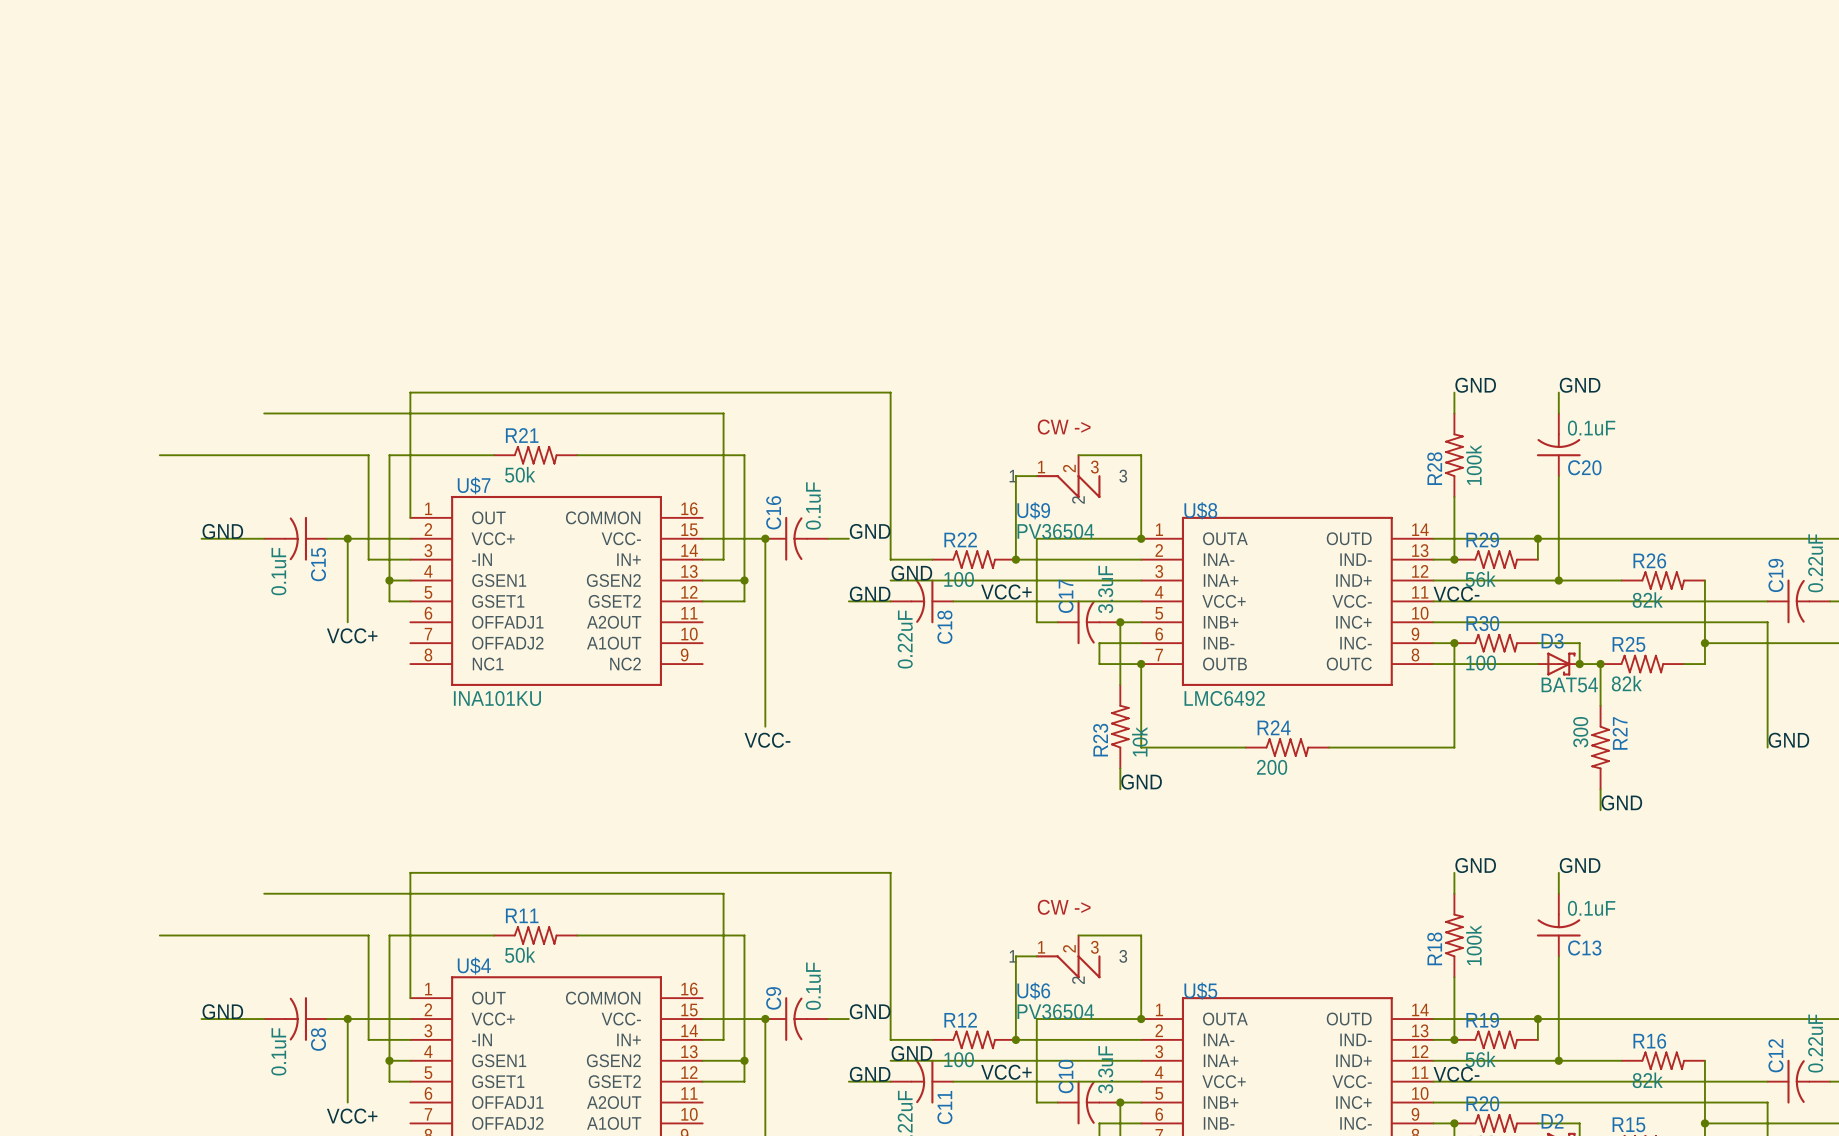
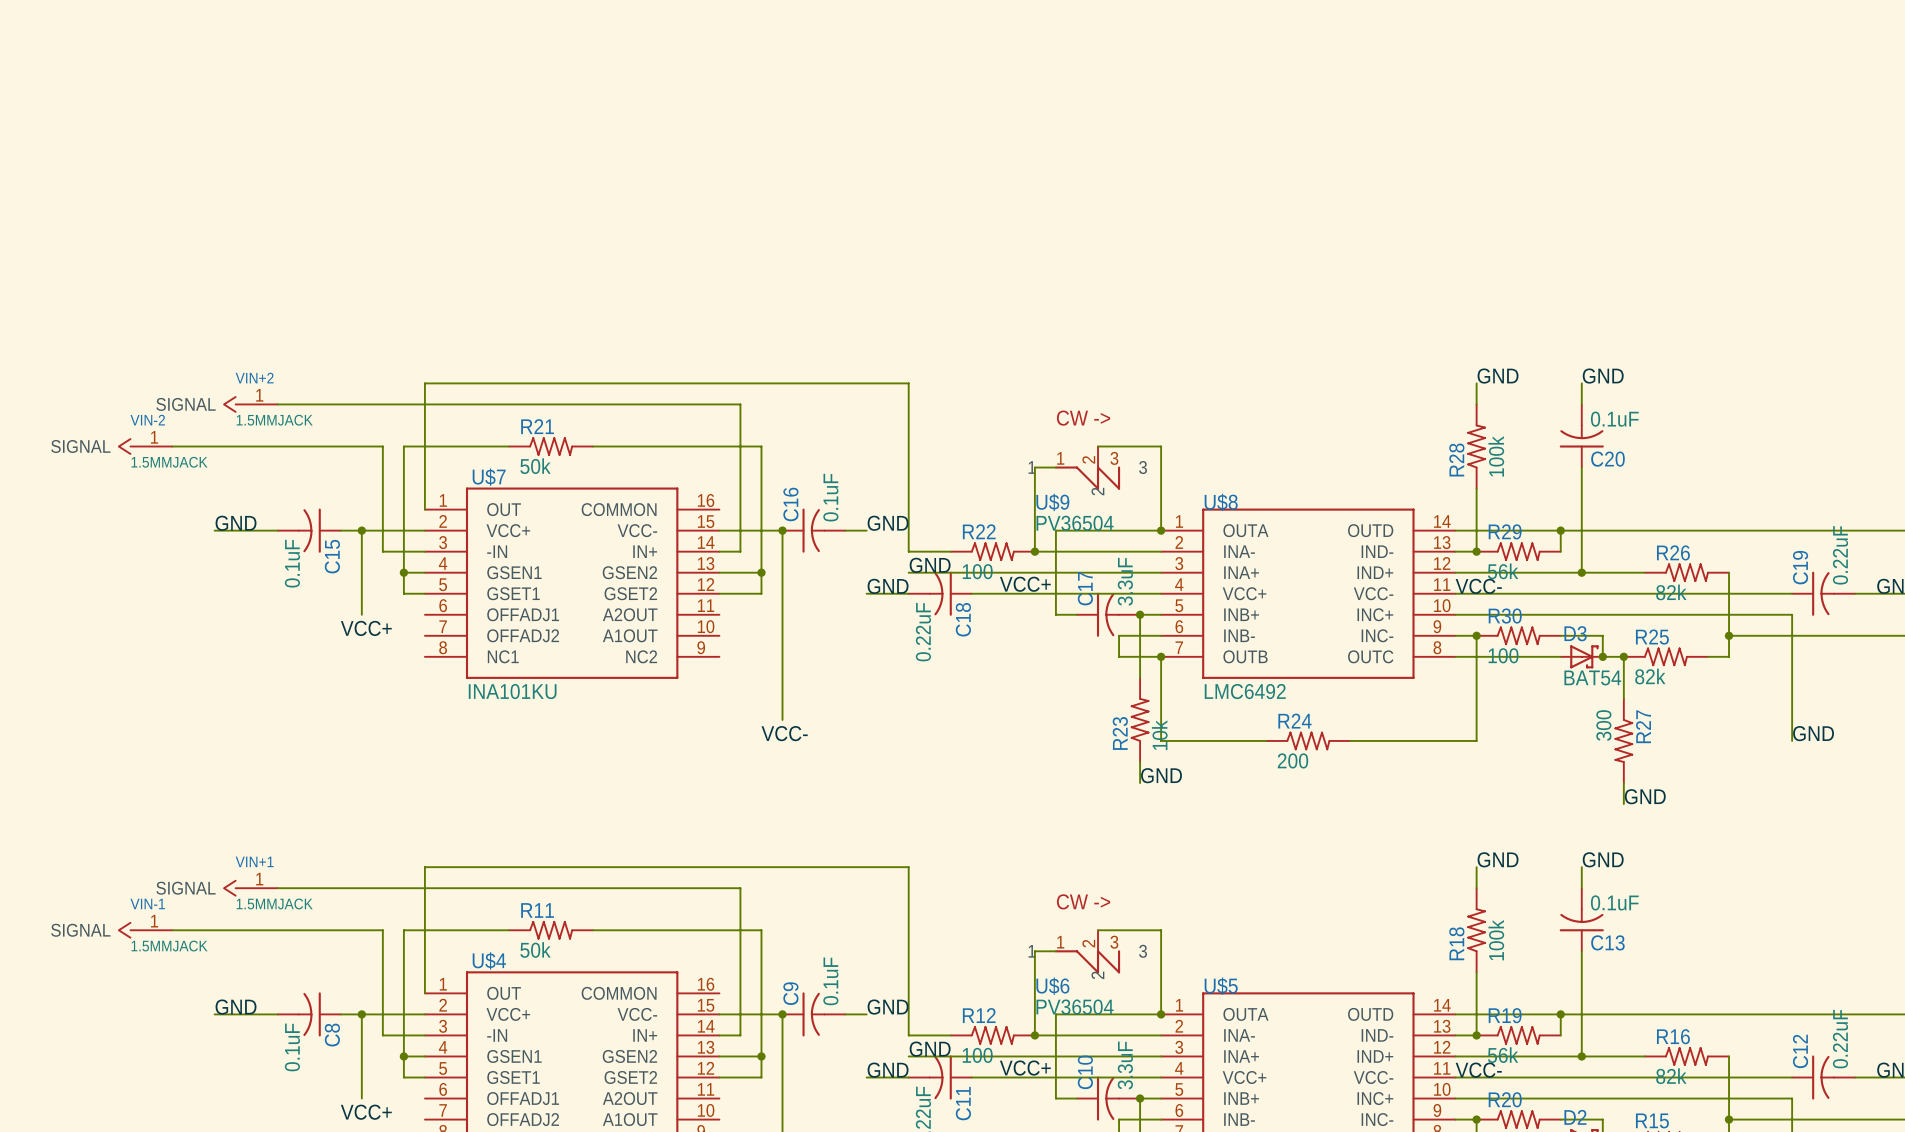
VIN+2: none -> 1.5MMJACK (250, 404)
VIN-2: none -> 1.5MMJACK (145, 446)
VIN+1: none -> 1.5MMJACK (250, 888)
VIN-1: none -> 1.5MMJACK (145, 930)

